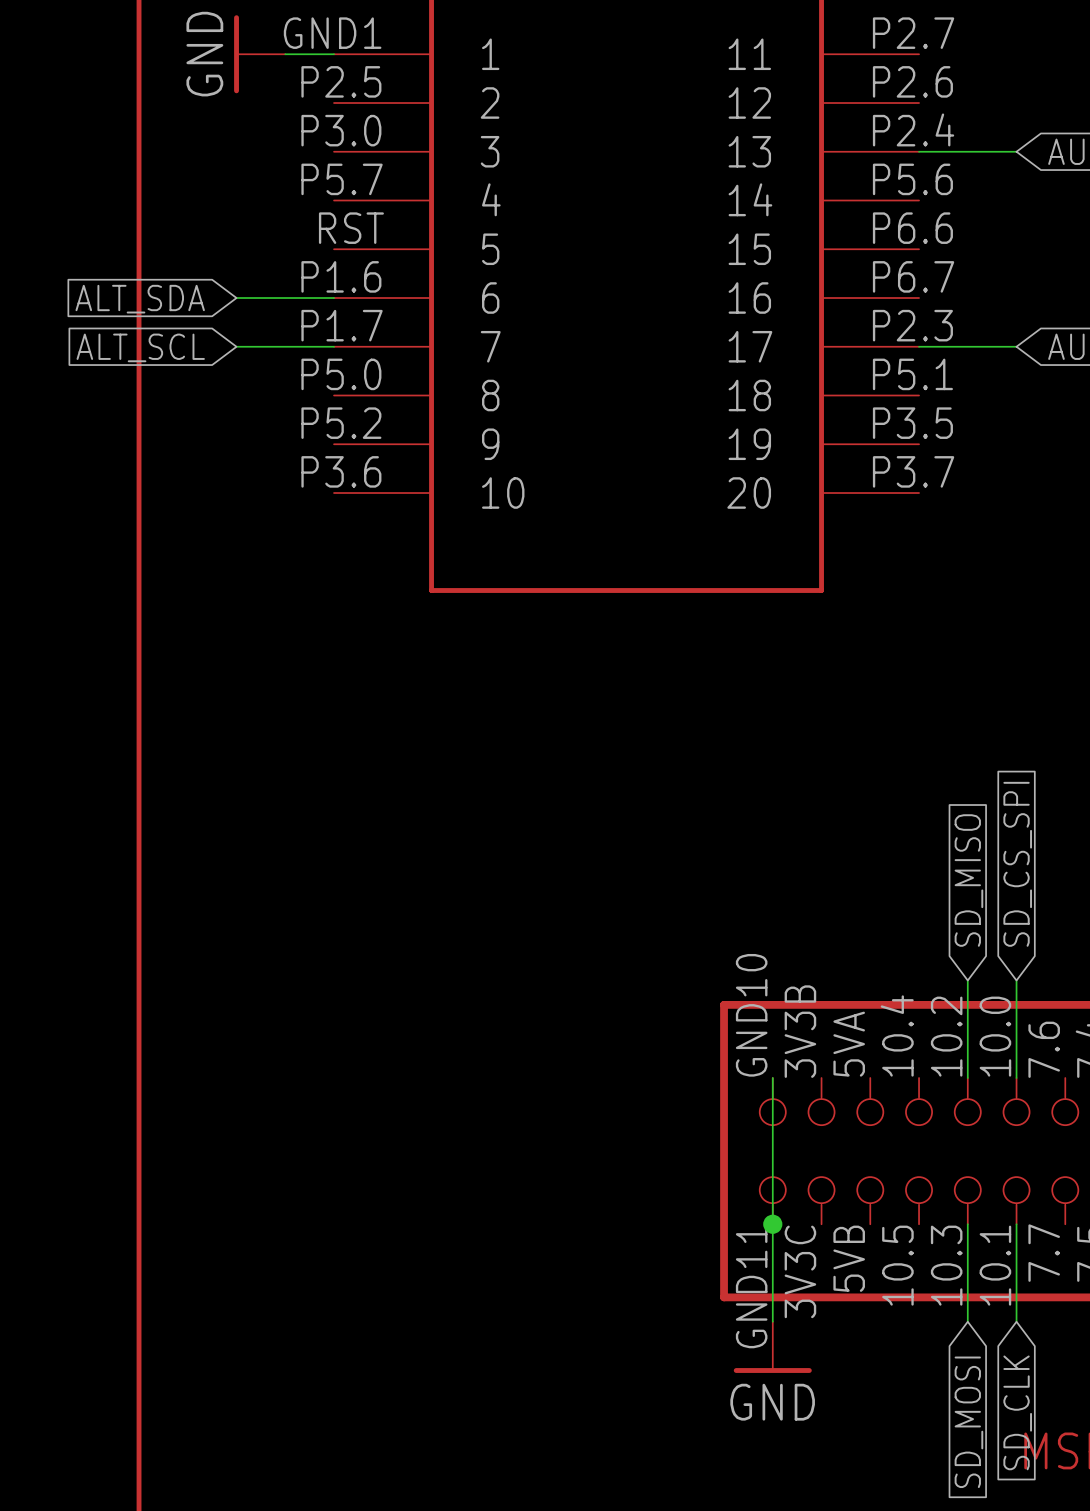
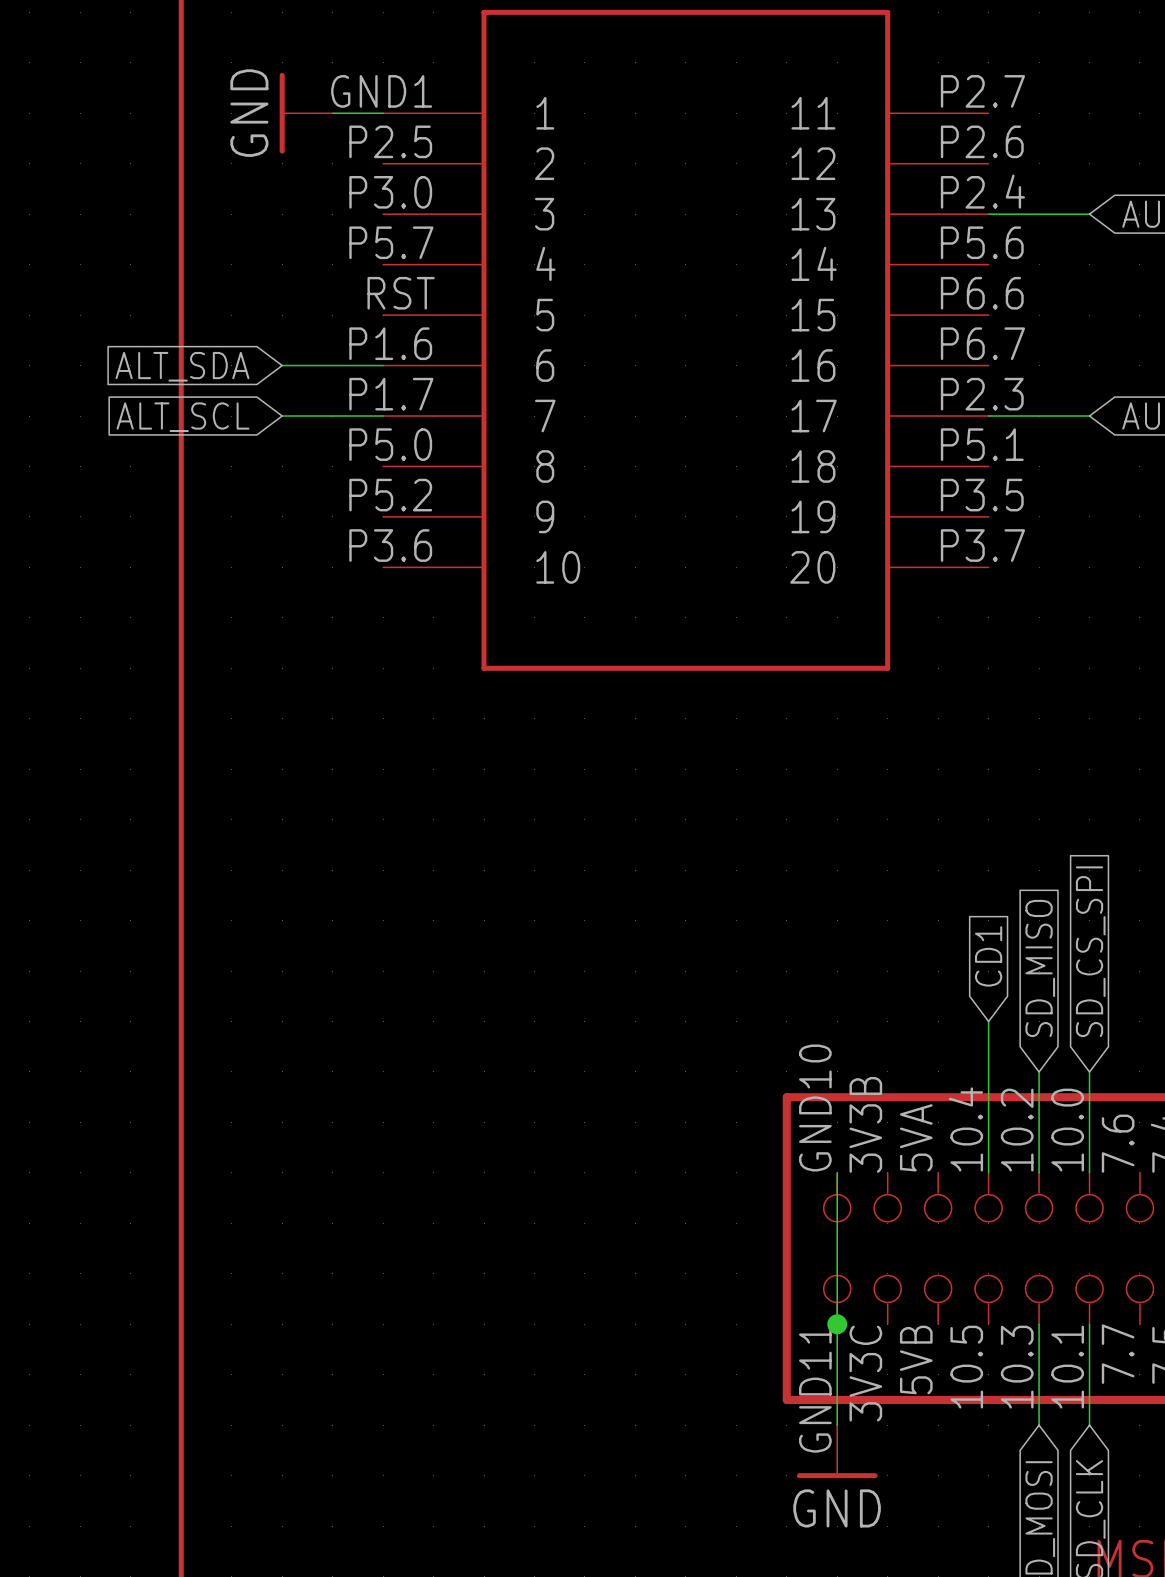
global label: none -> CD1 (988, 956)
wire: none -> (988, 1021) (988, 1172)

